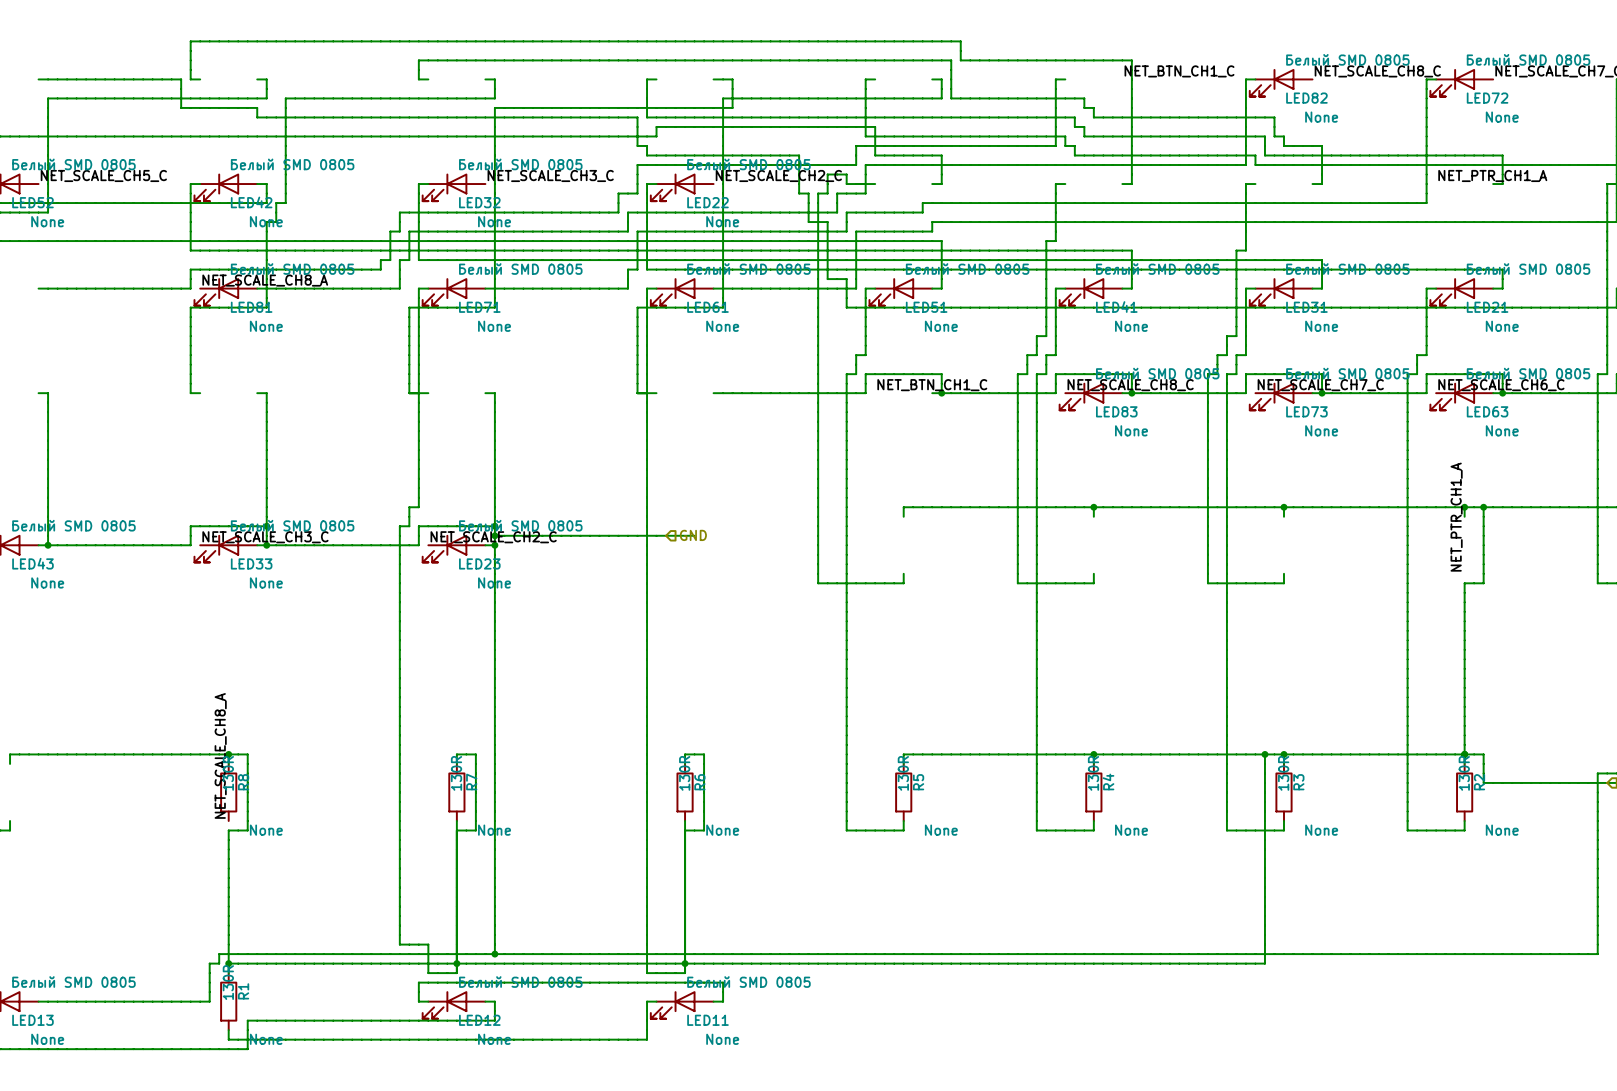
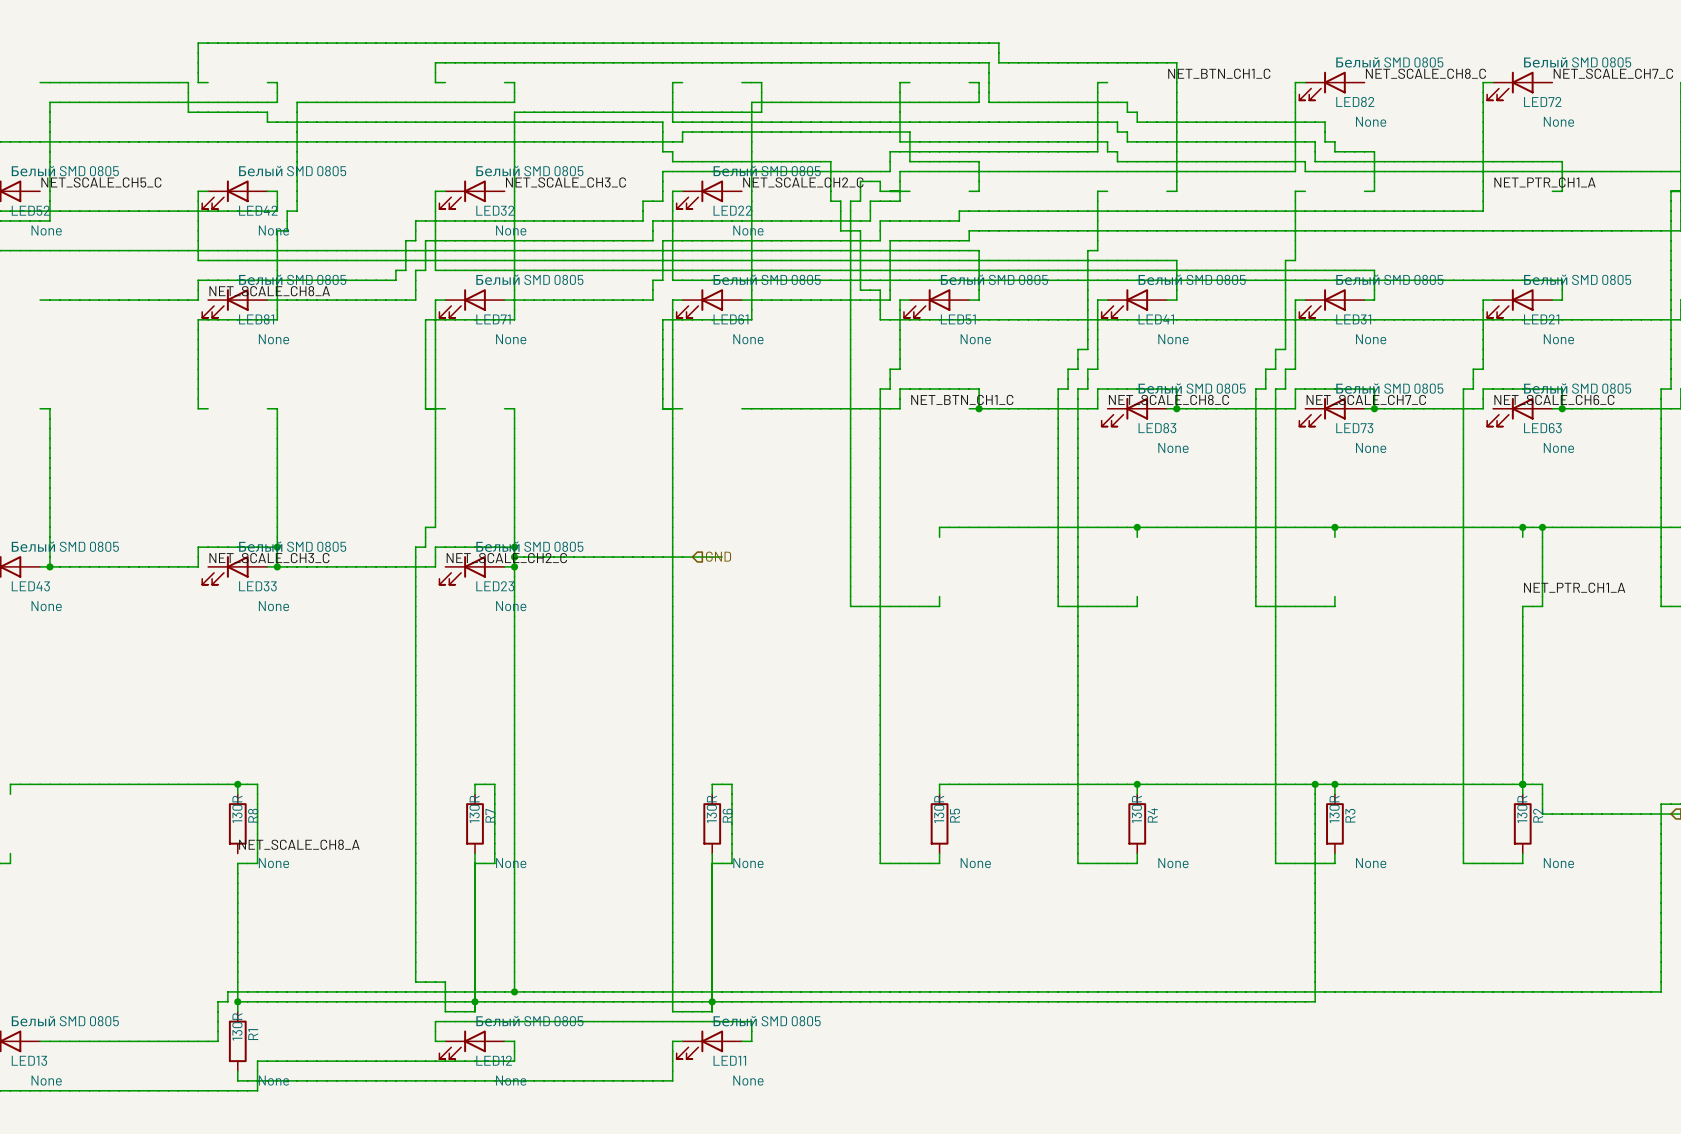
label rotation: 0° (1456, 517) -> 90° clockwise (1574, 587)
label rotation: 0° (220, 755) -> 90° clockwise (299, 844)

